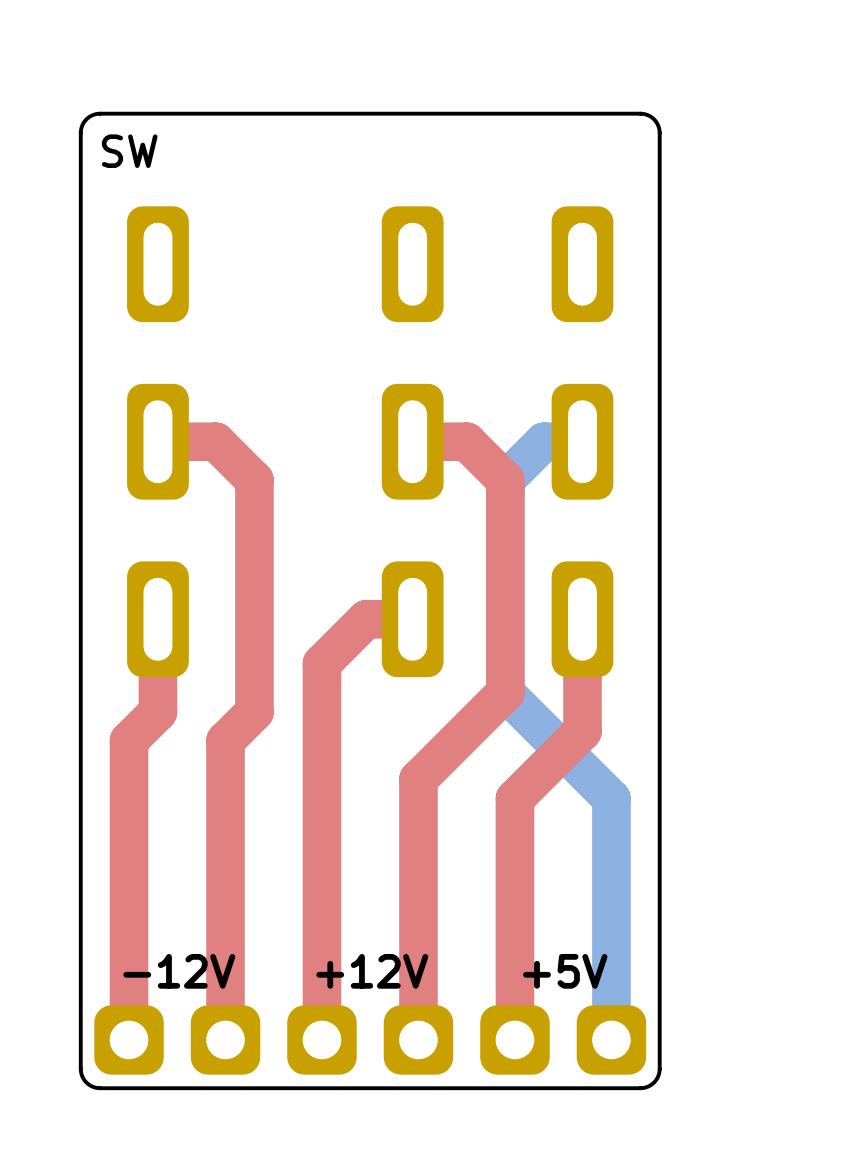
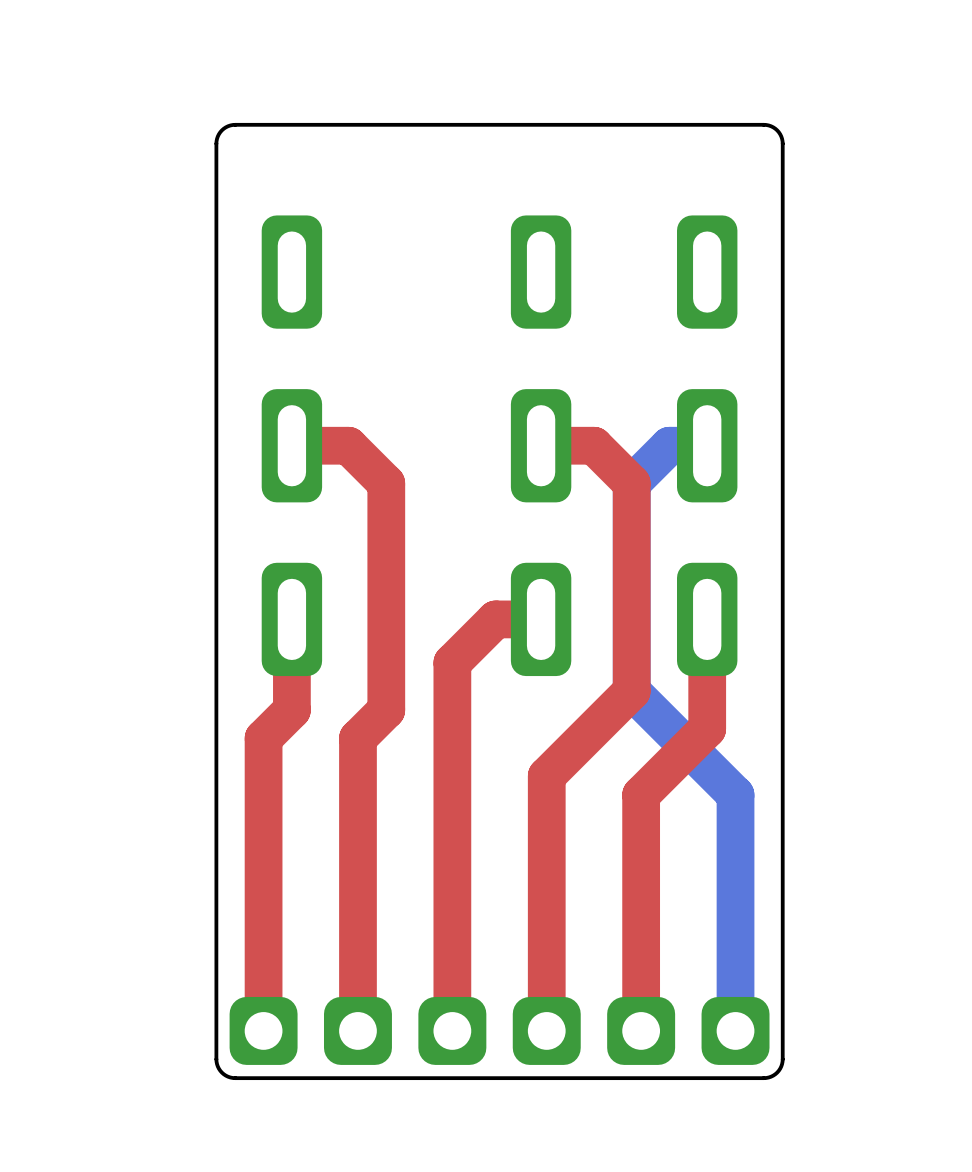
text: SW (129, 151) -> none
text: -12V (179, 971) -> none
text: +12V (372, 971) -> none
text: +5V (565, 971) -> none

